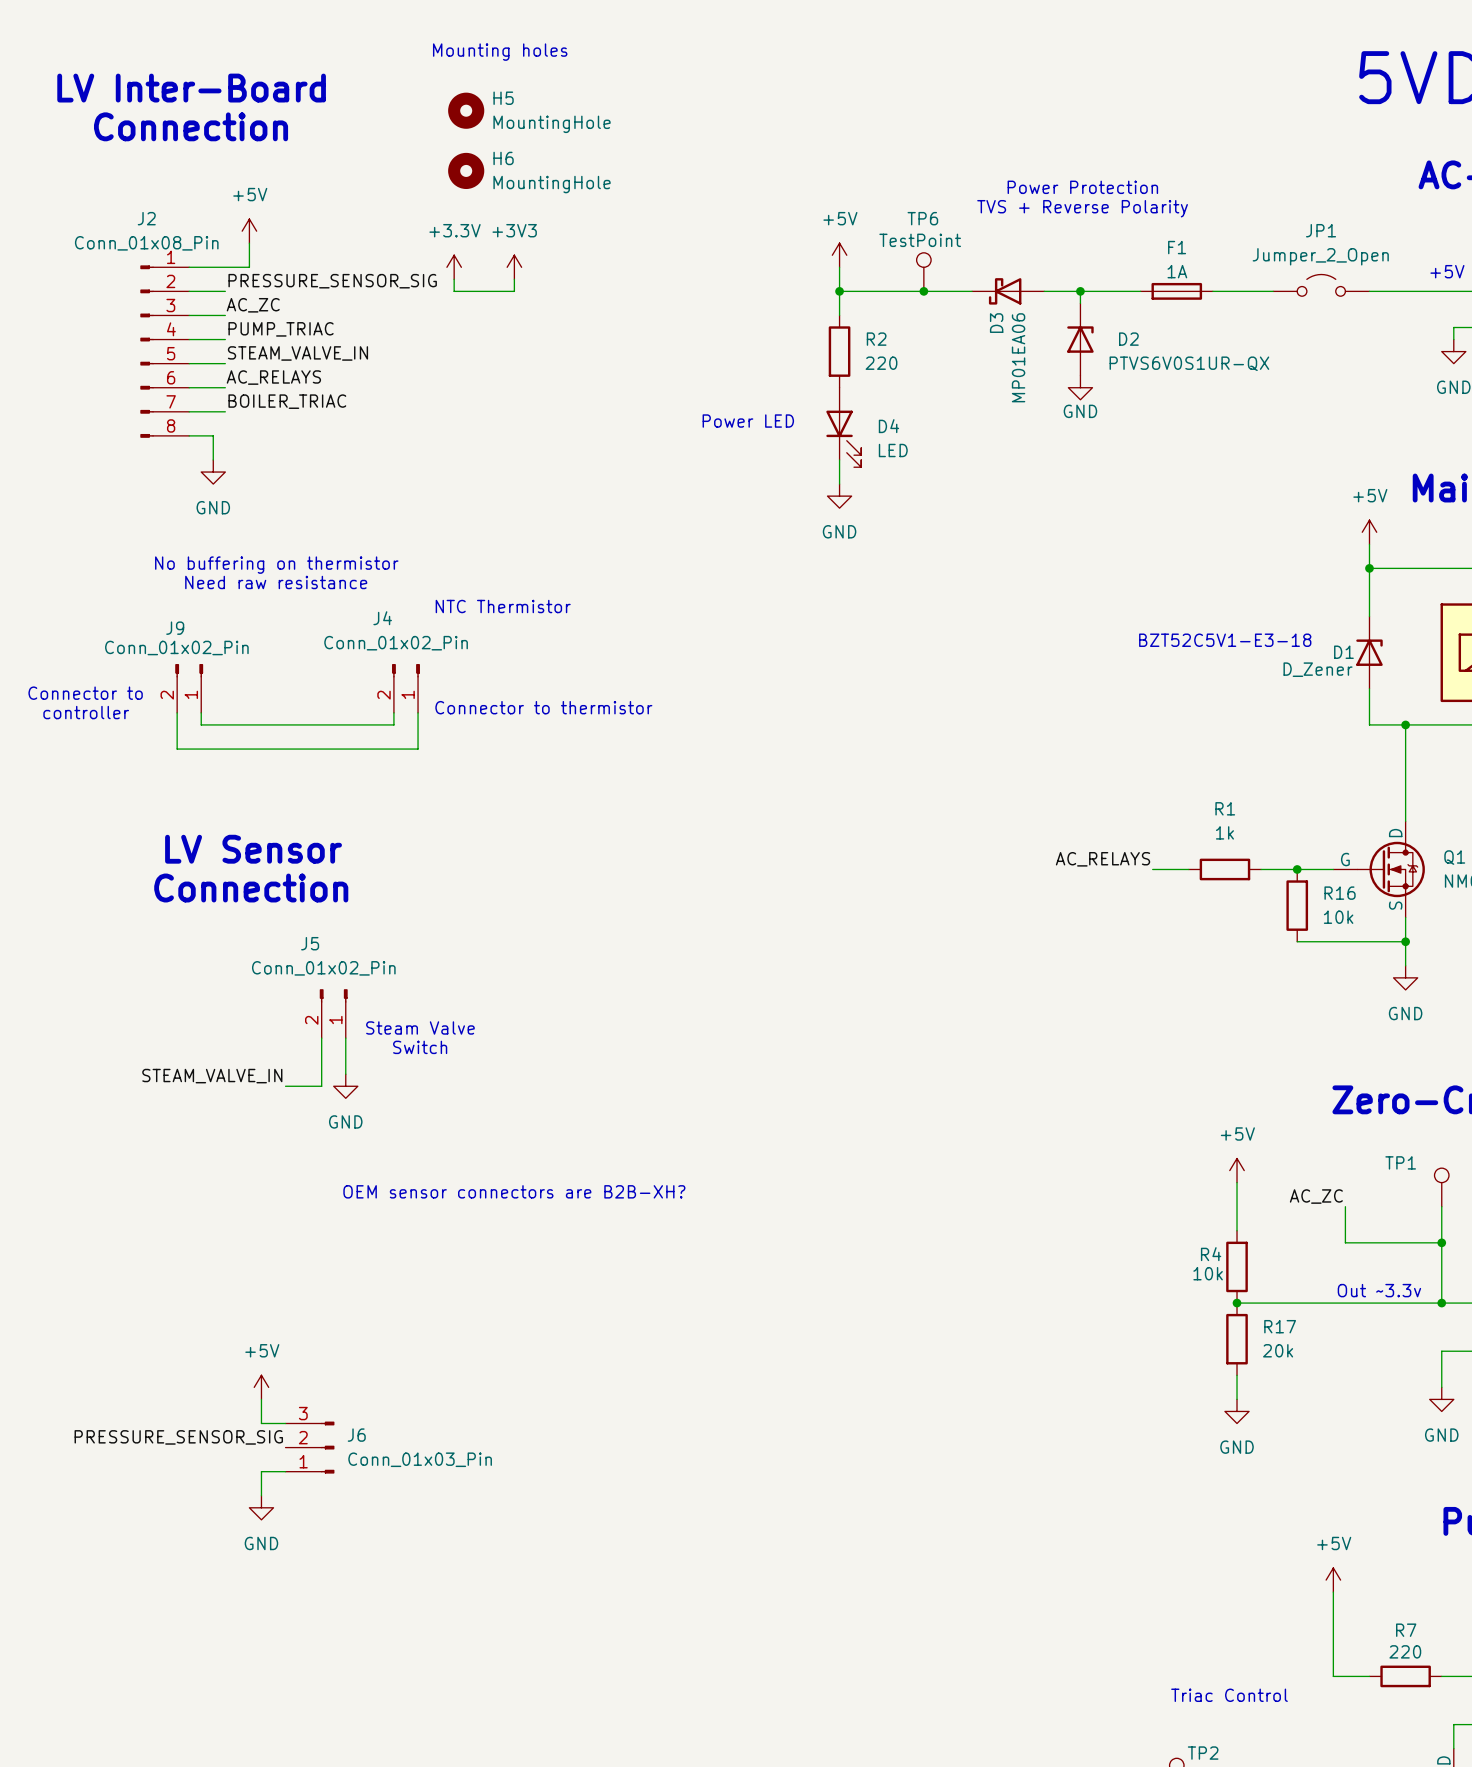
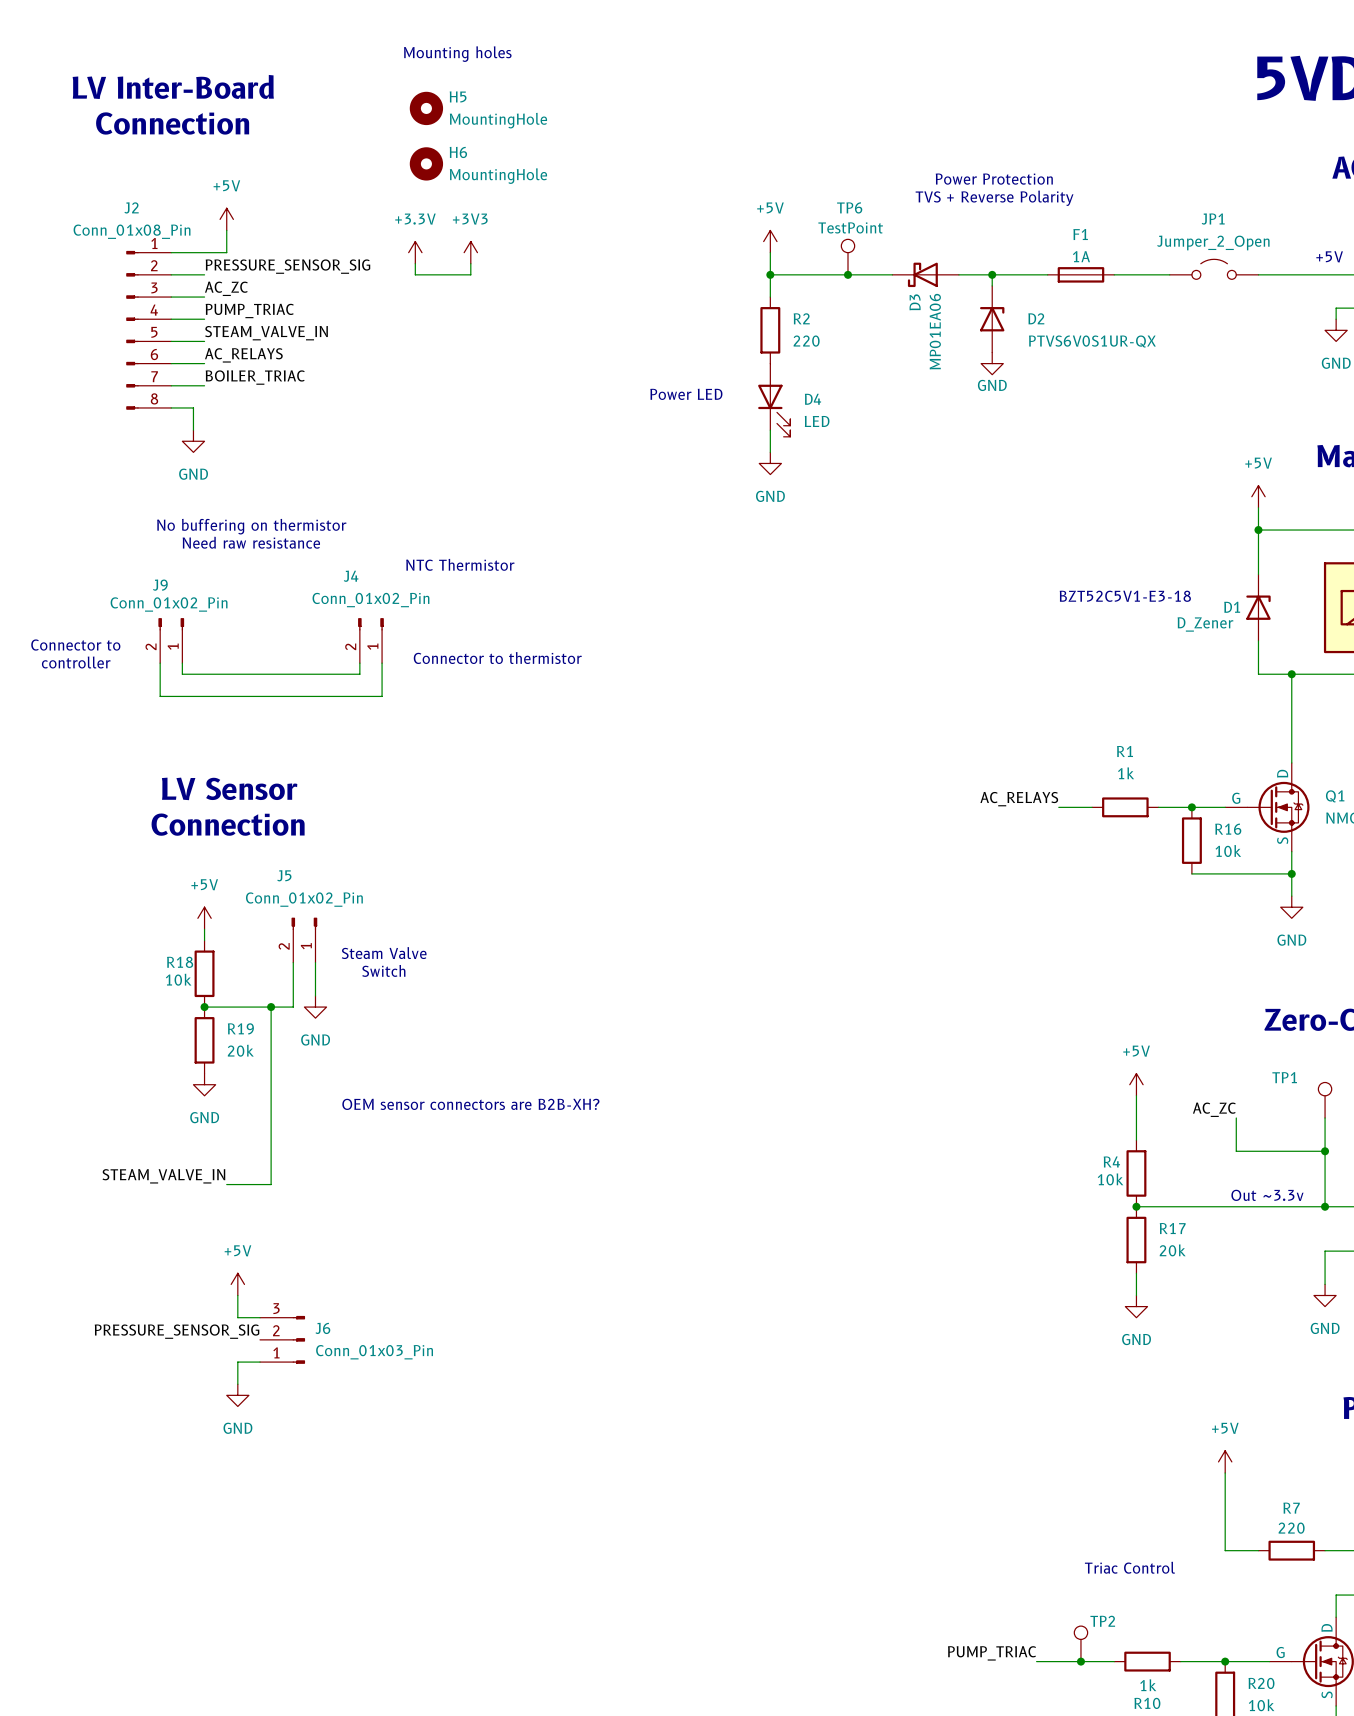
power symbol: none -> +5V (204, 918)
wire: none -> (204, 929) (204, 940)
R18: none -> 10k (204, 973)
label position: STEAM_VALVE_IN (212, 1076) -> STEAM_VALVE_IN (163, 1176)
wire: none -> (204, 1007) (260, 1007)
junction: none -> (204, 1007)
wire: none -> (271, 1007) (271, 1184) (226, 1184)
junction: none -> (271, 1007)
R19: none -> 20k (204, 1040)
power symbol: none -> GND (204, 1084)

